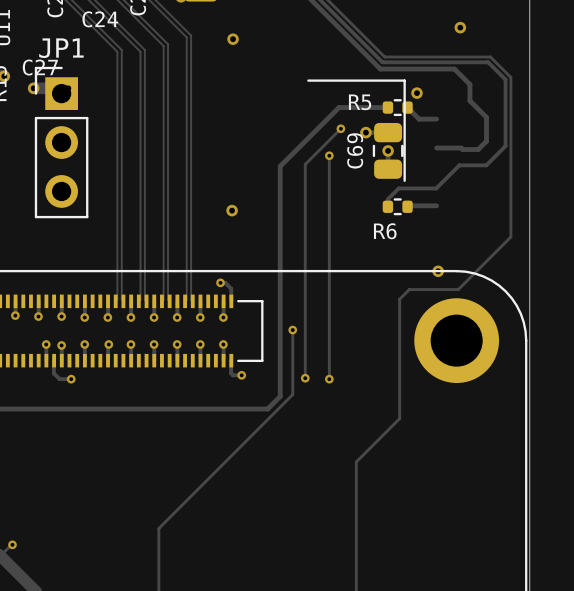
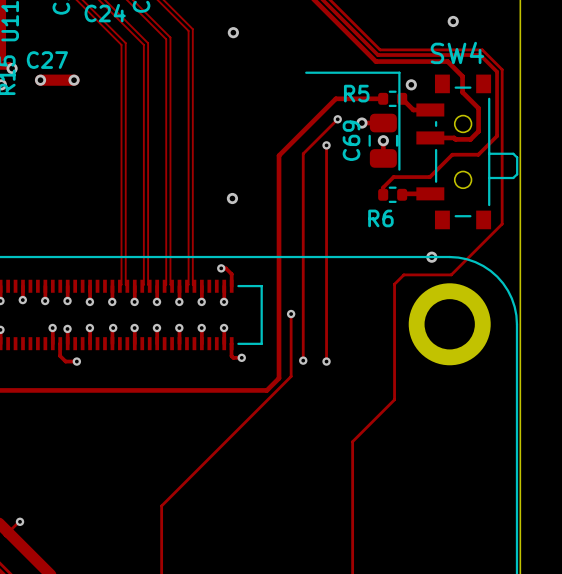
JP1: (61, 142) -> none
SW4: none -> (467, 151)

